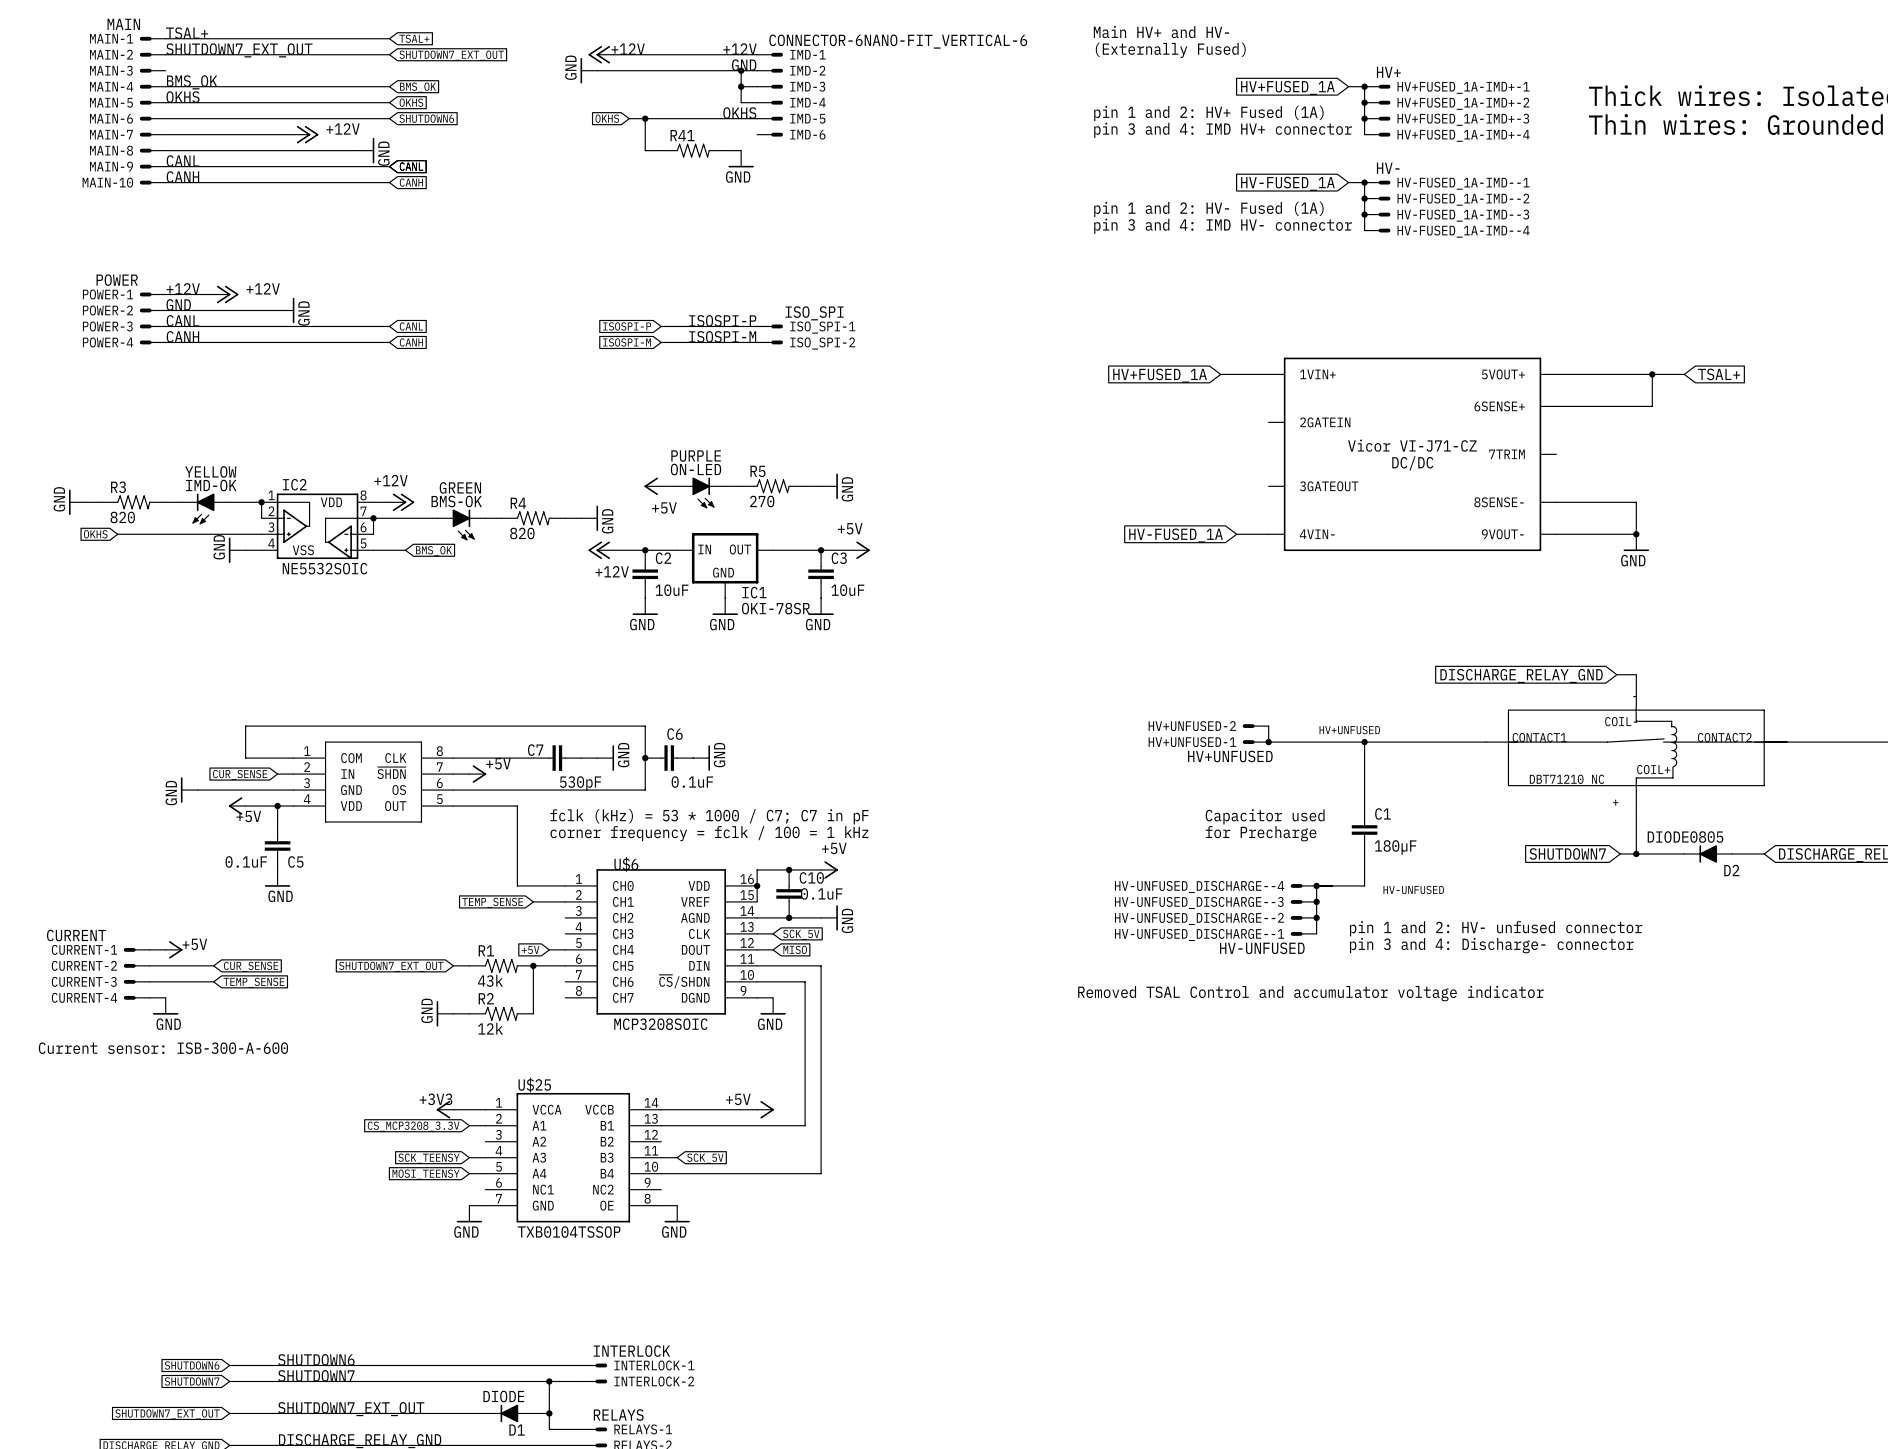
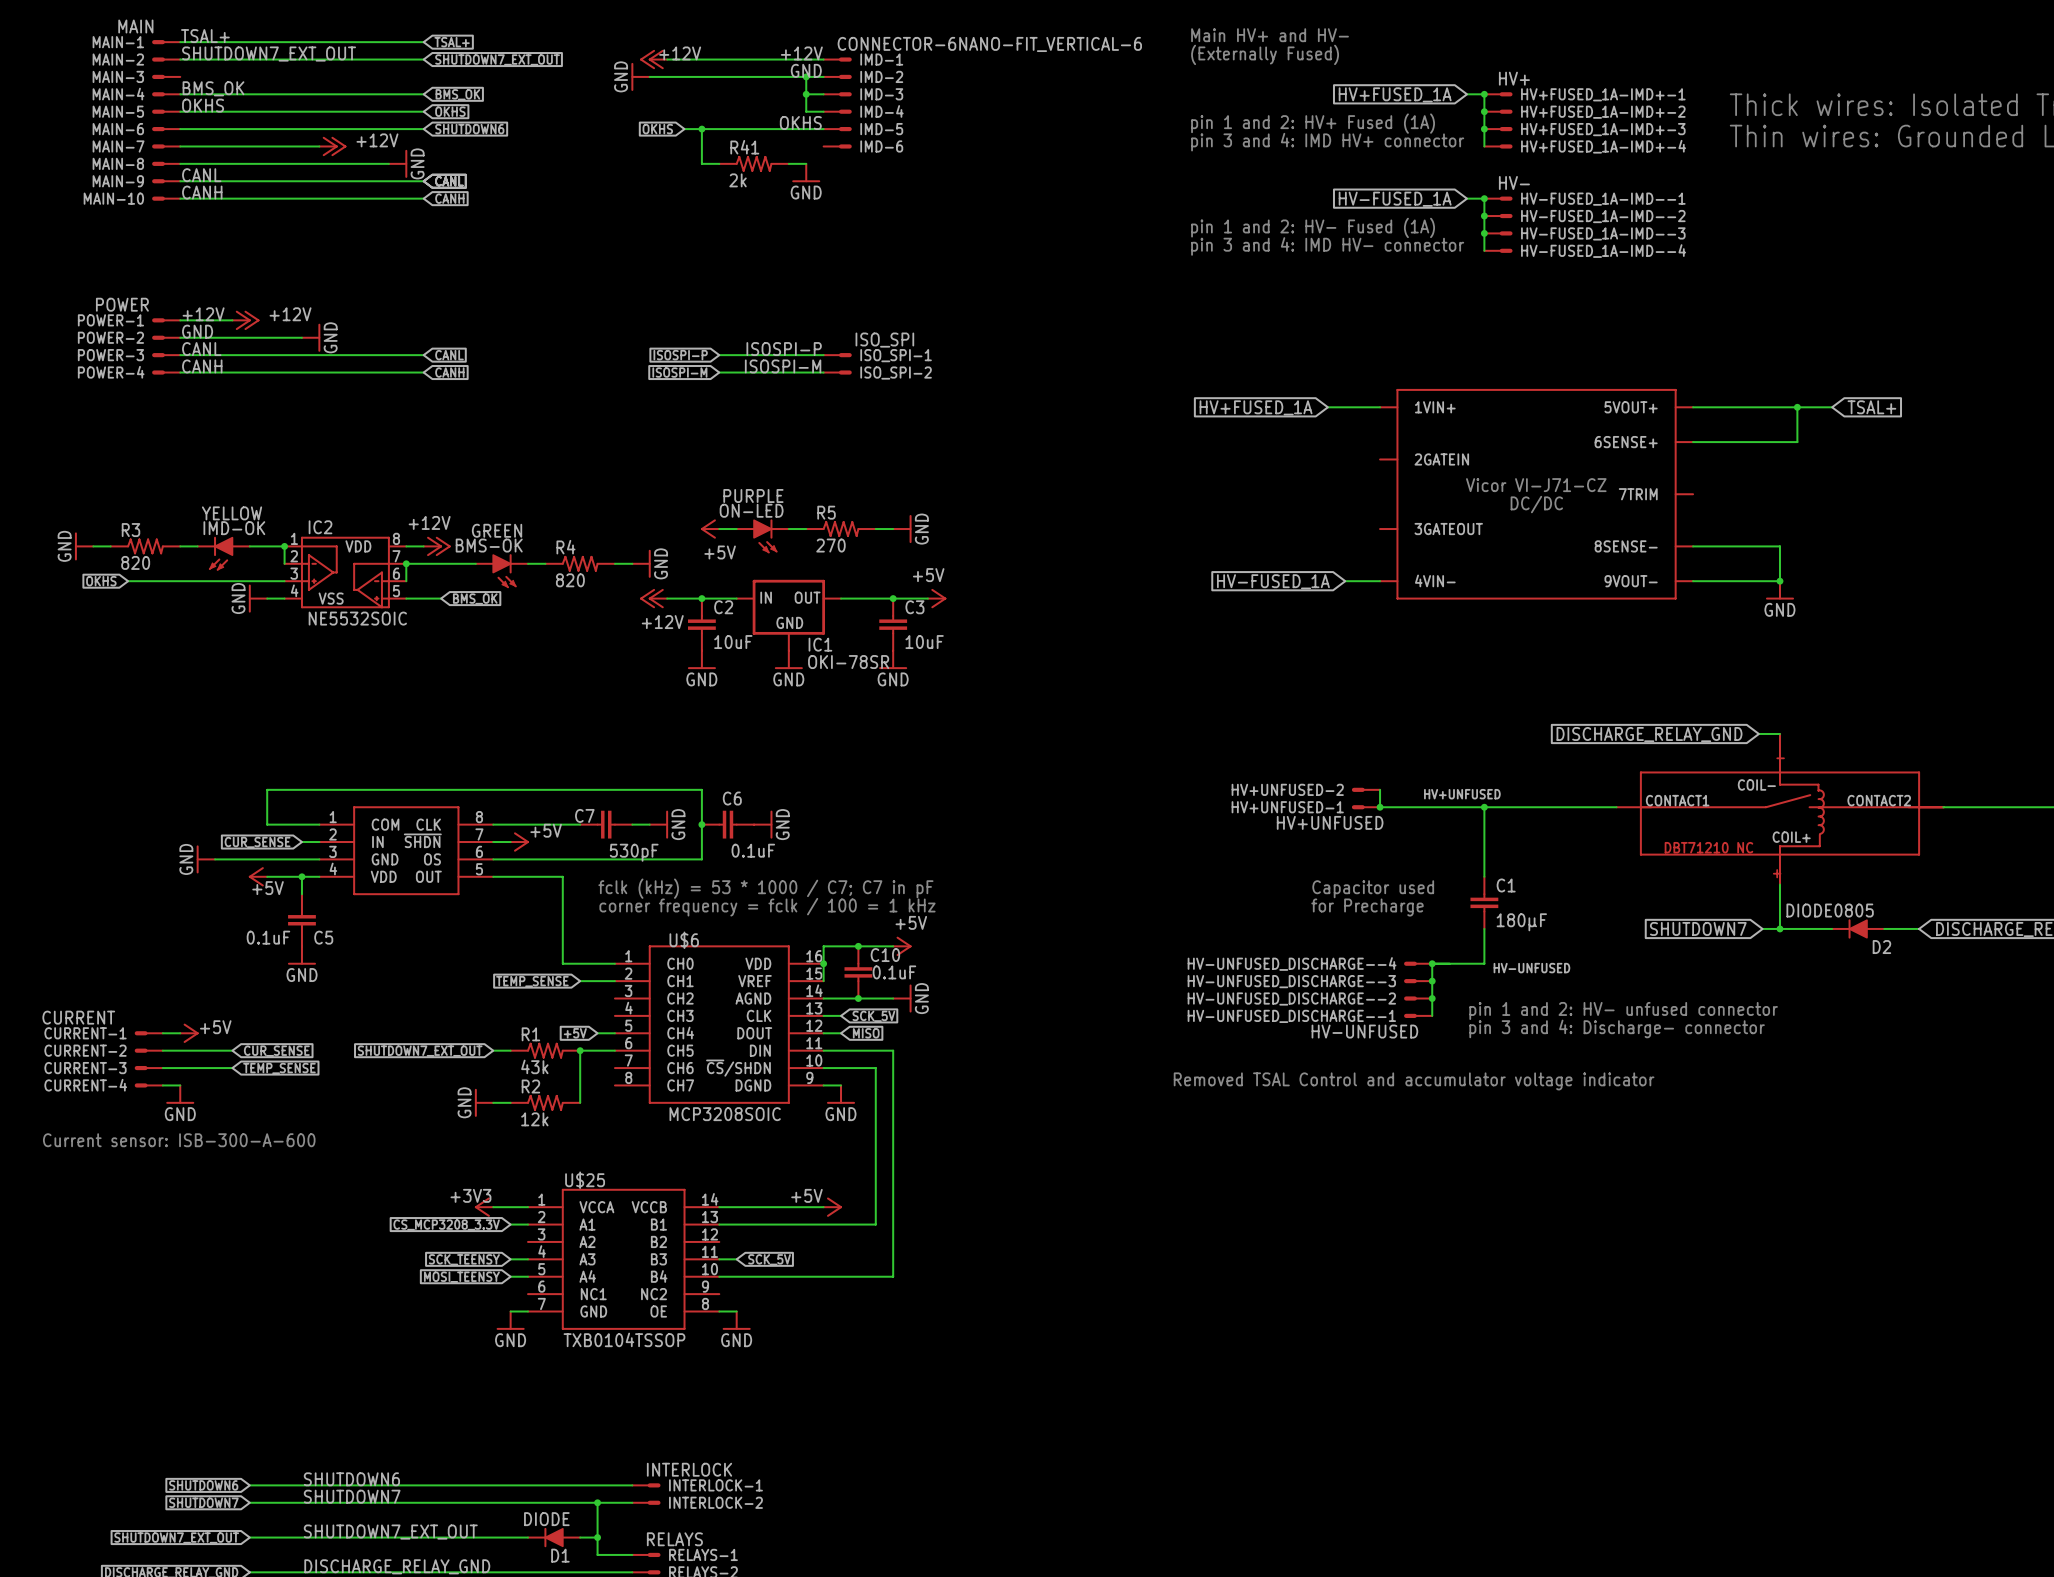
R41 value: none -> 2k (738, 180)
part symbol: [1486, 674, 1788, 814] -> [1616, 733, 1945, 885]

